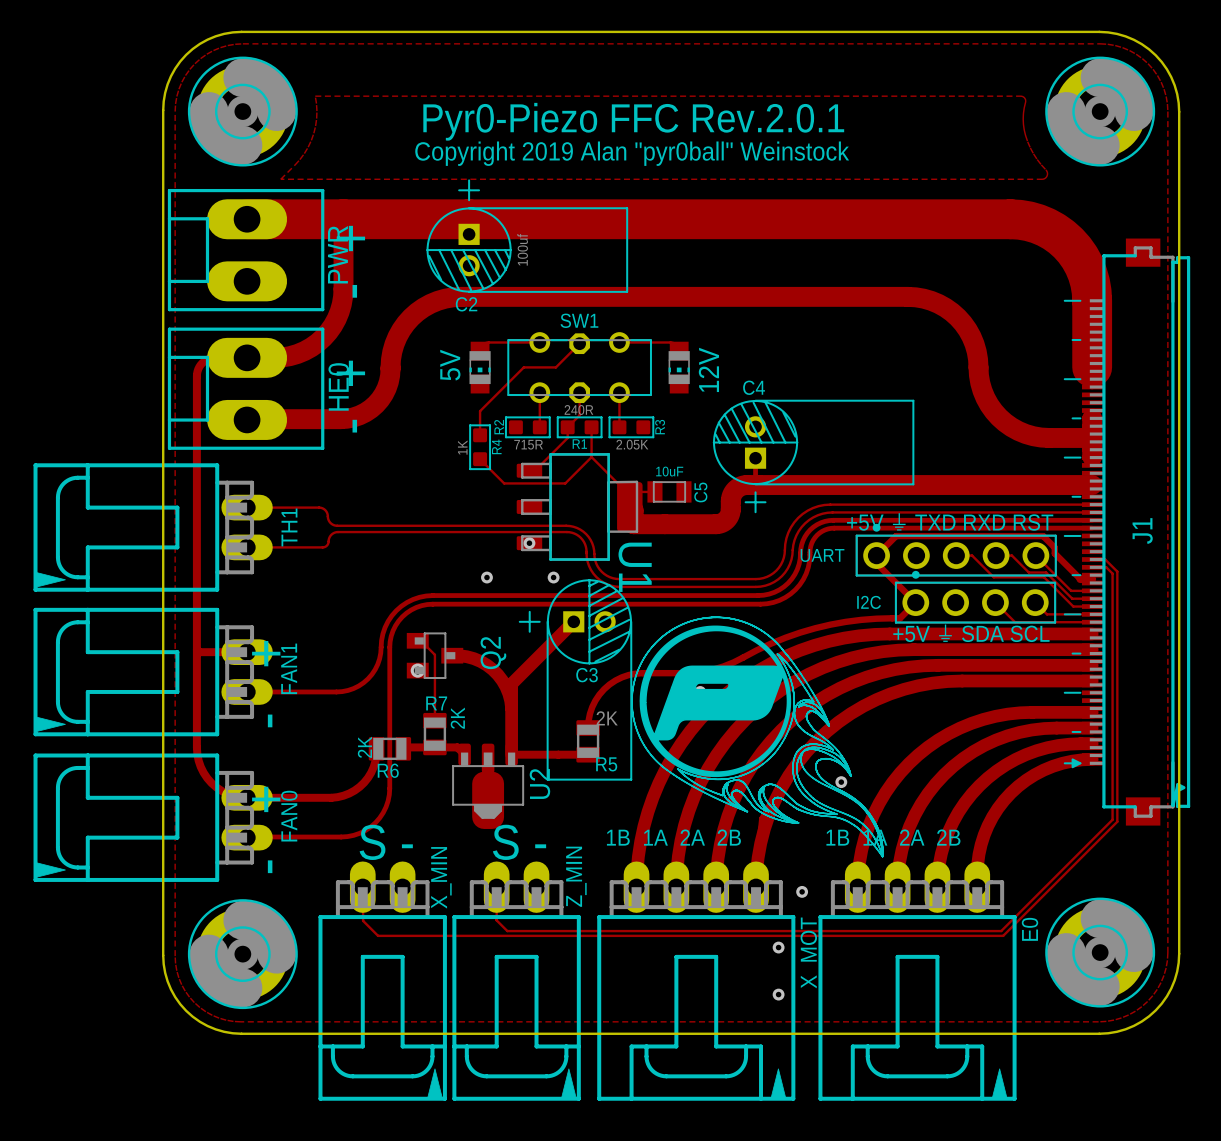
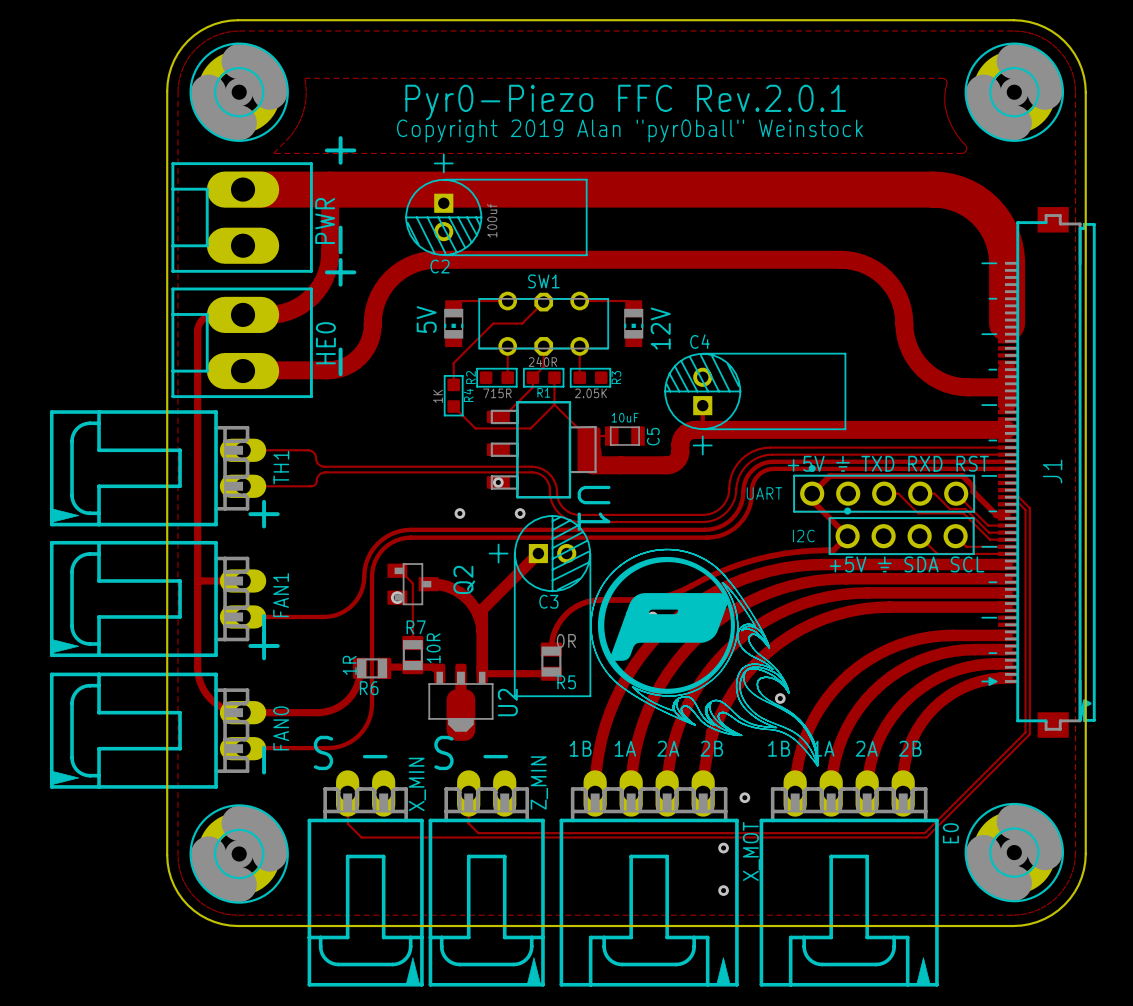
R7 value: 2K (457, 718) -> 10R (433, 648)
R5 value: 2K (607, 718) -> 0R (566, 640)
R6 value: 2K (364, 747) -> 1R (349, 665)

